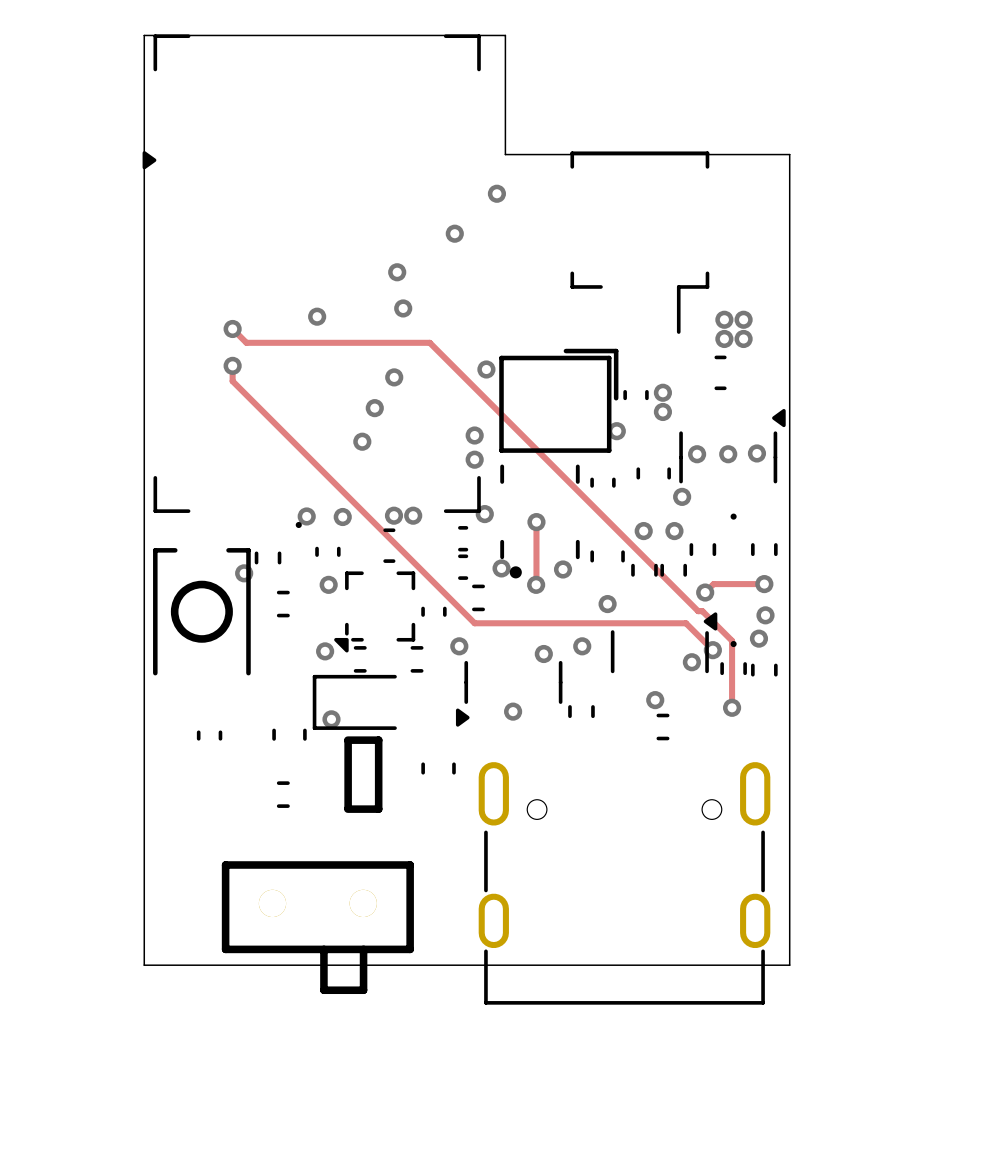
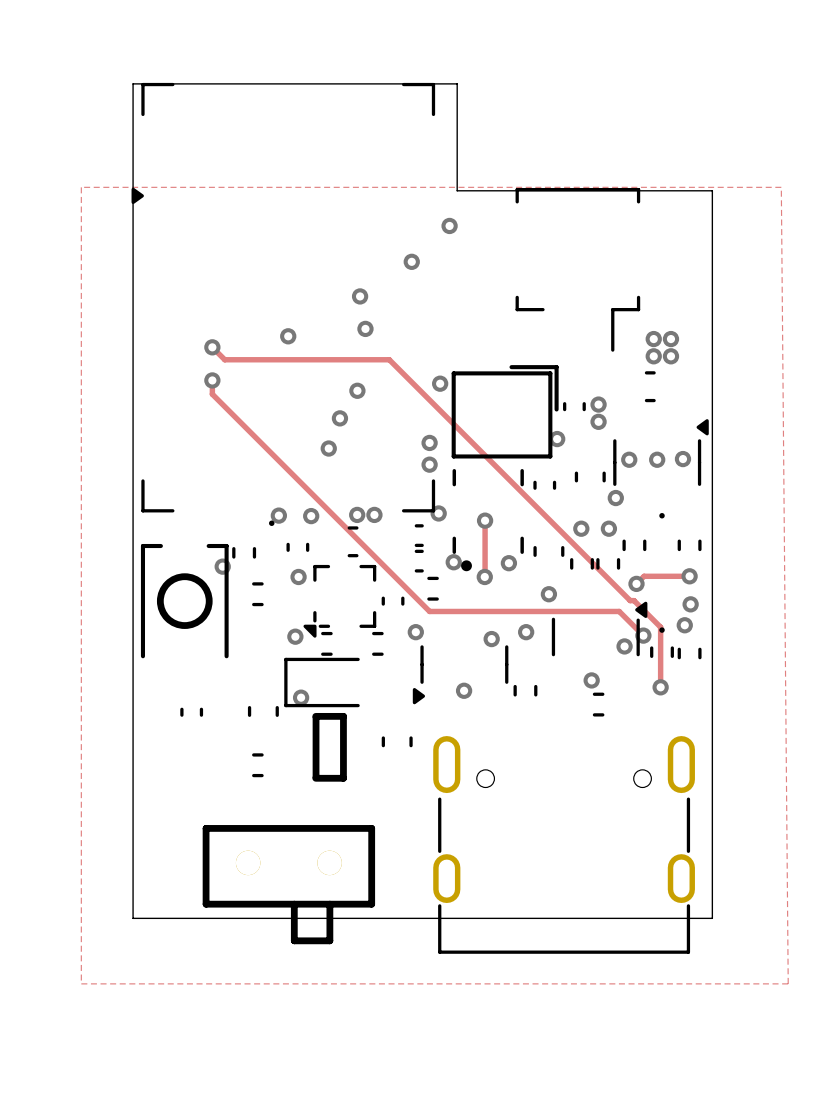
zone outline: none -> (81, 187) (81, 983) (788, 983) (781, 187) (81, 187)

